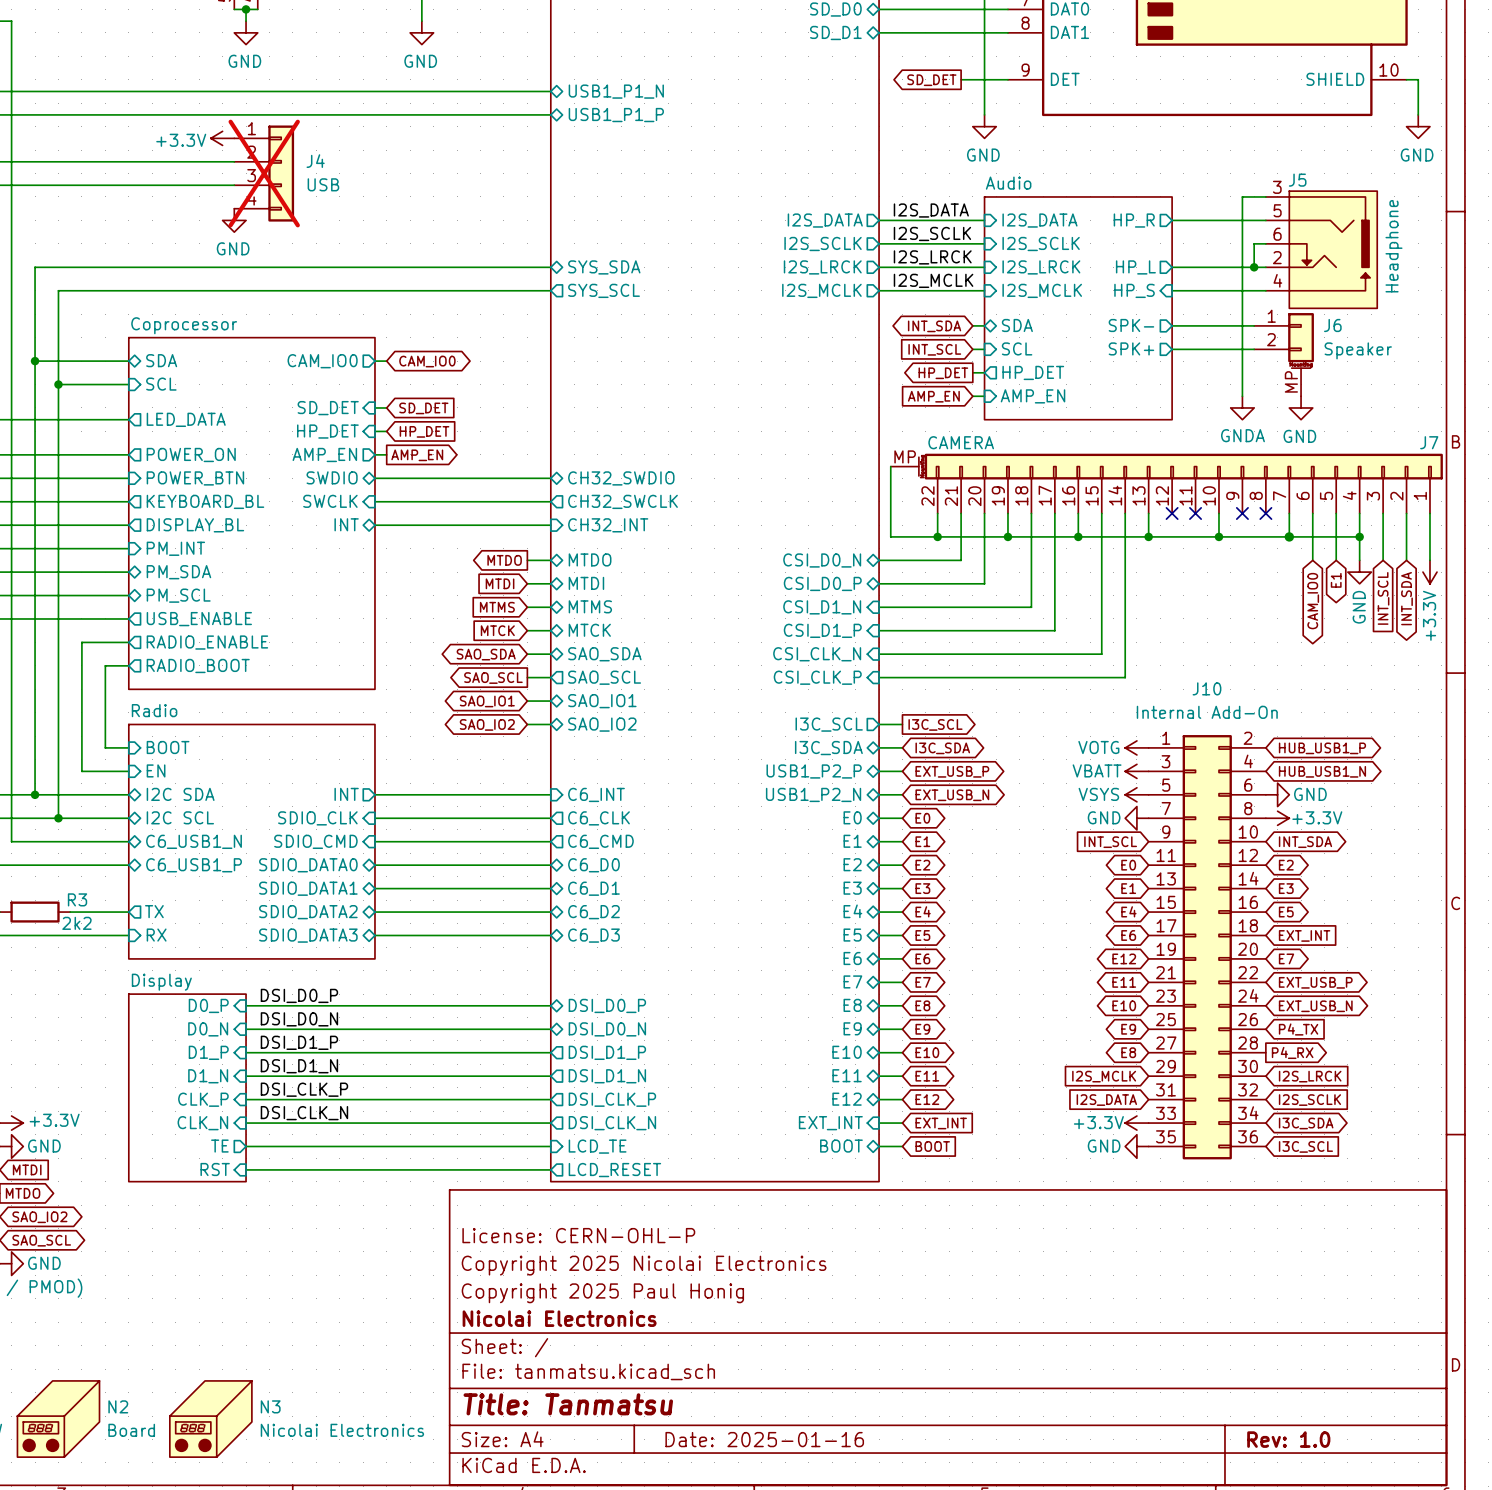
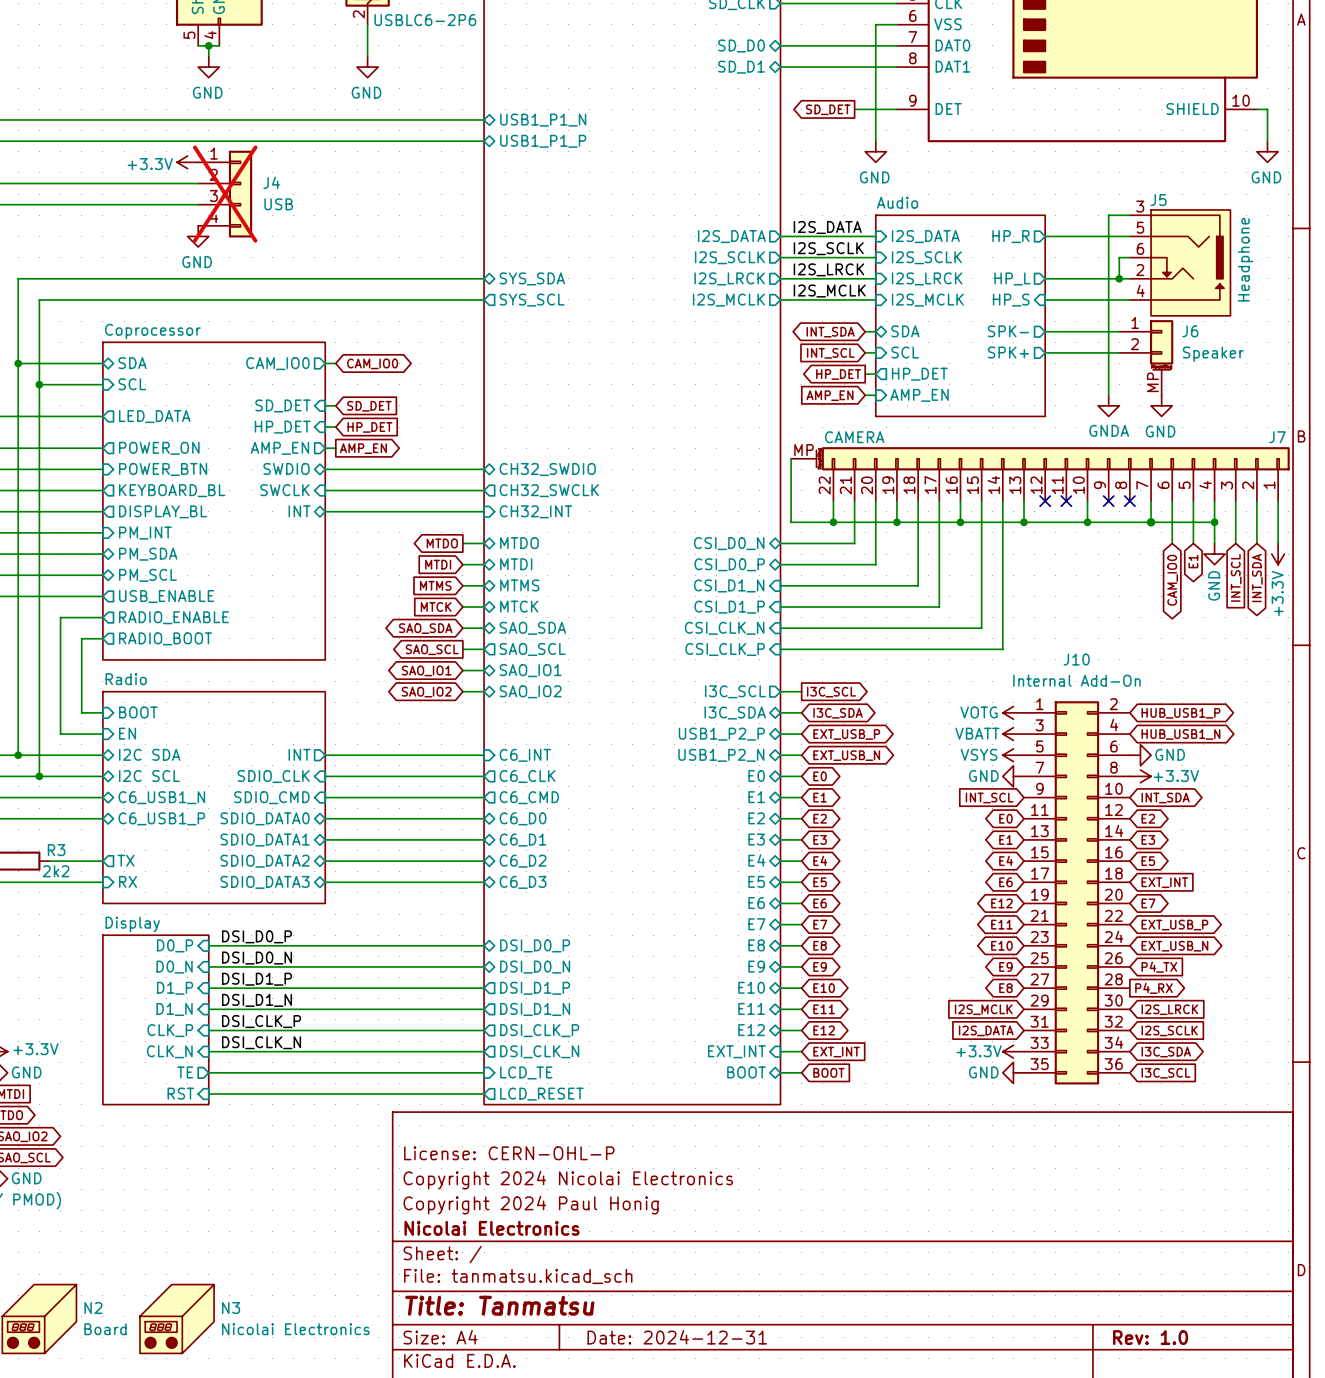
title block: Copyright 2025 Nicolai Electronics (644, 1265) -> Copyright 2024 Nicolai Electronics (568, 1180)
title block: Copyright 2025 Paul Honig (602, 1293) -> Copyright 2024 Paul Honig (531, 1205)
title block: Date: 2025-01-16 (764, 1439) -> Date: 2024-12-31 (677, 1337)

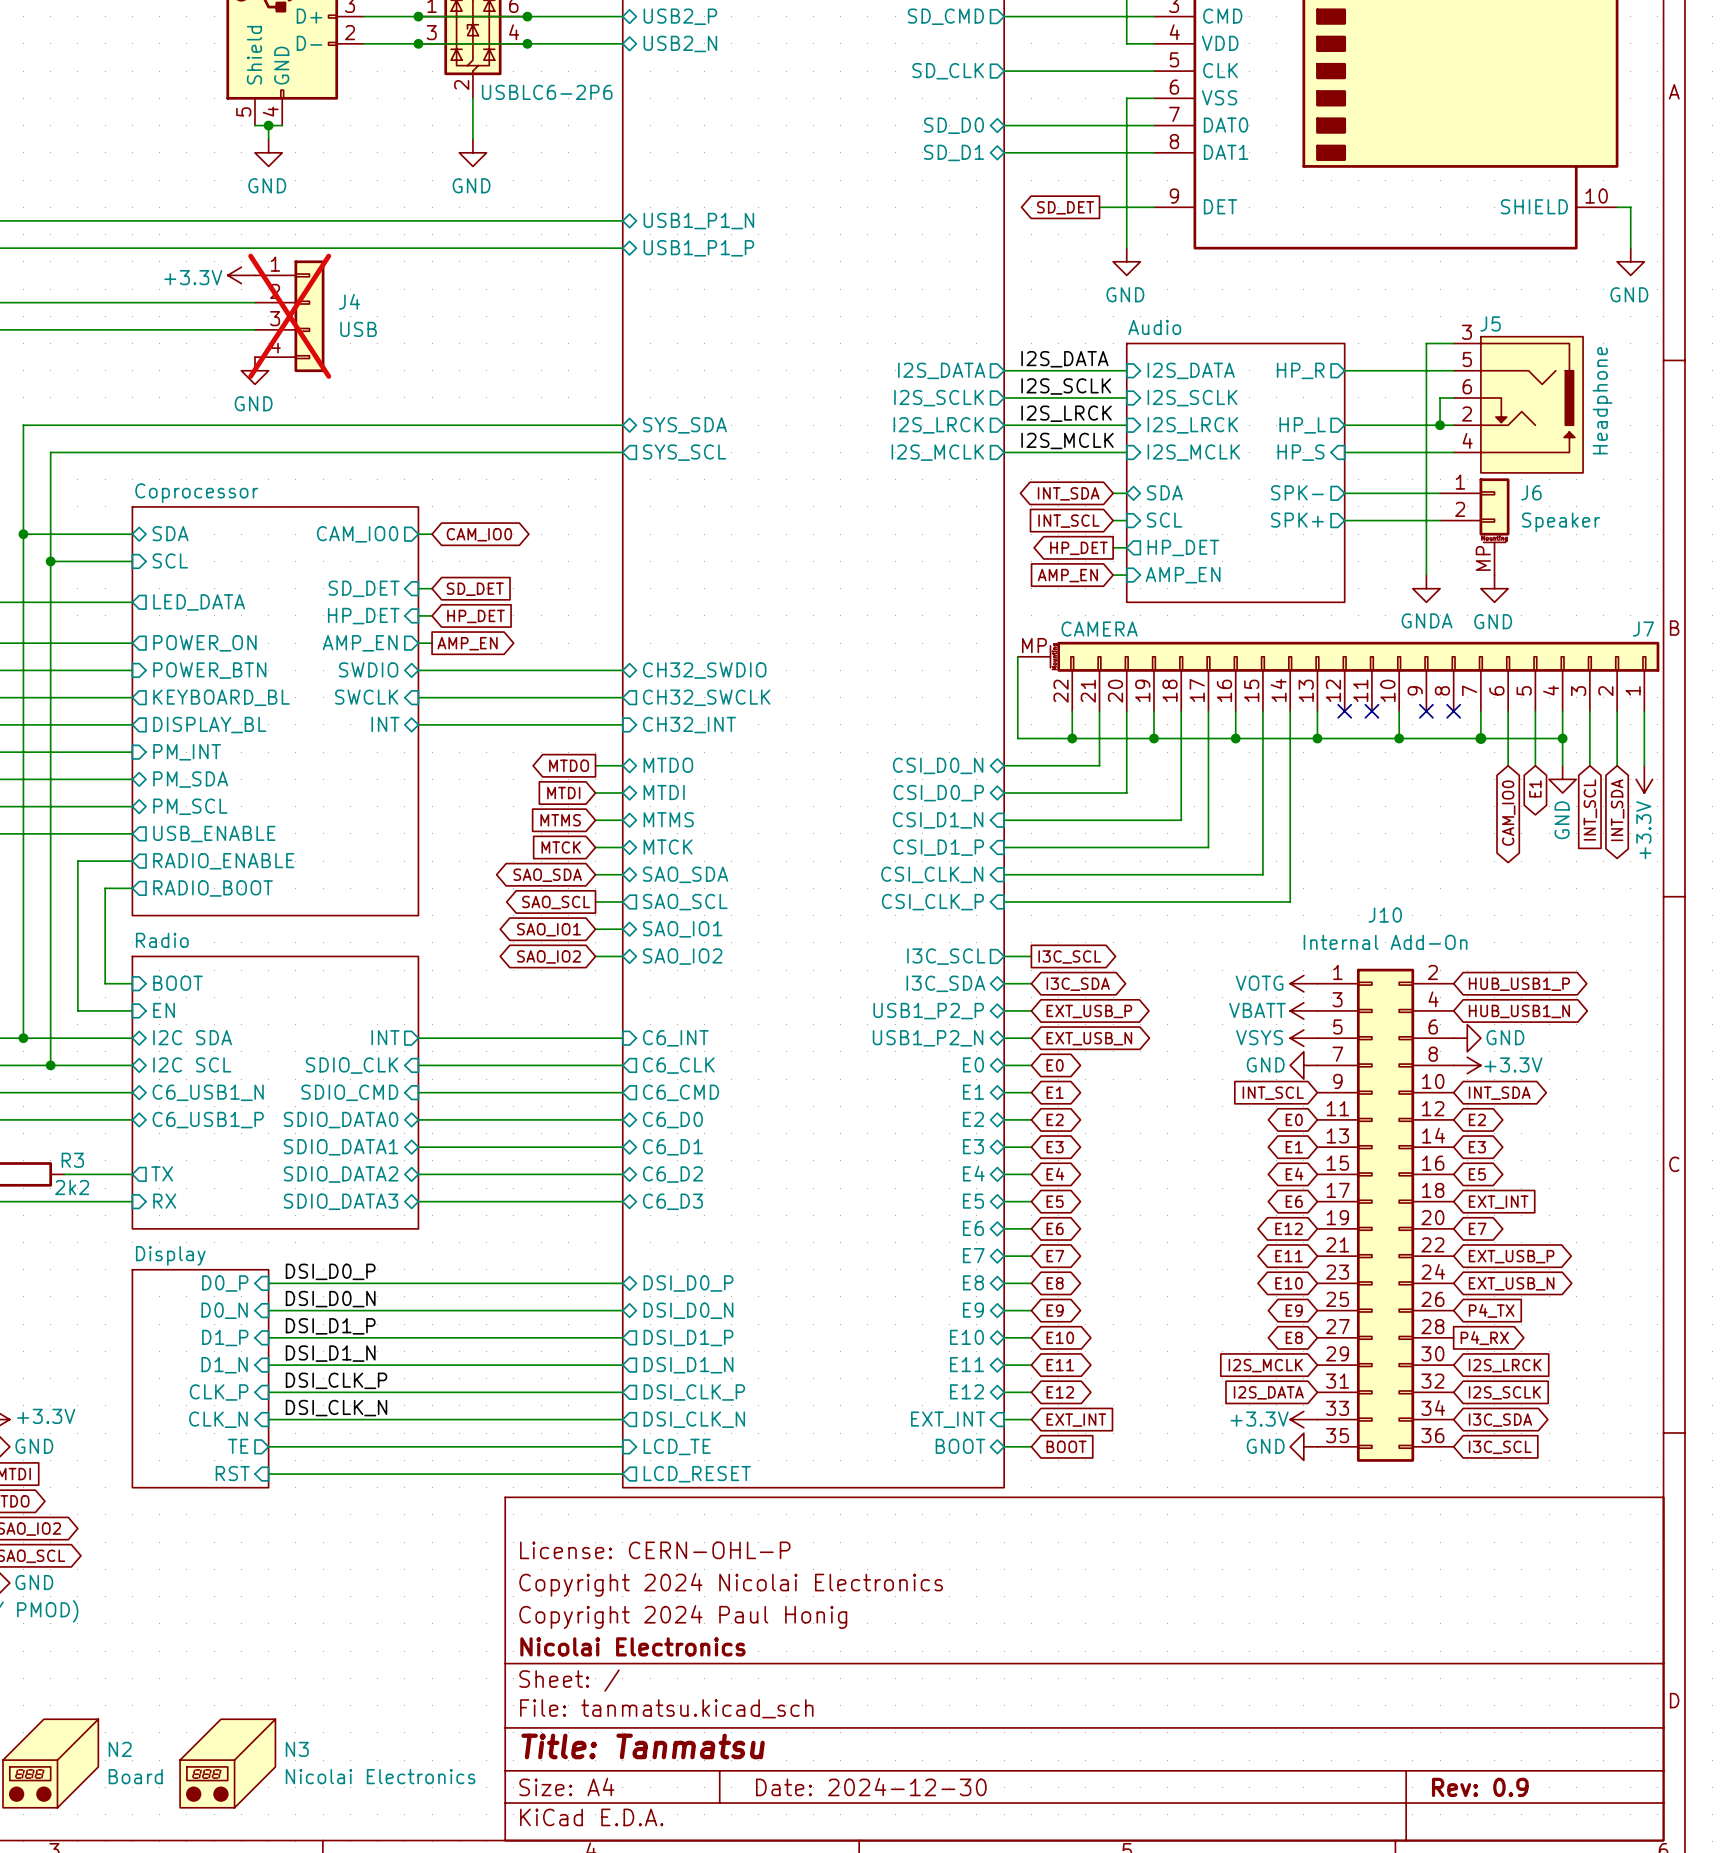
title block: Date: 2024-12-31 (677, 1337) -> Date: 2024-12-30 (871, 1787)
title block: Rev: 1.0 (1150, 1337) -> Rev: 0.9 (1480, 1787)

